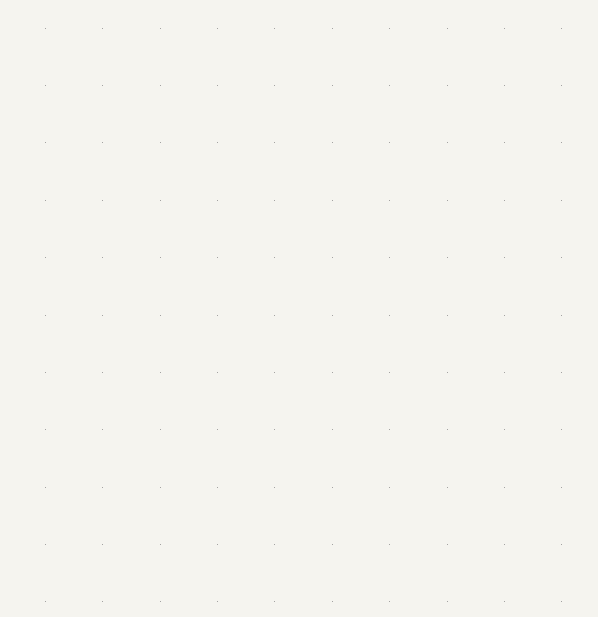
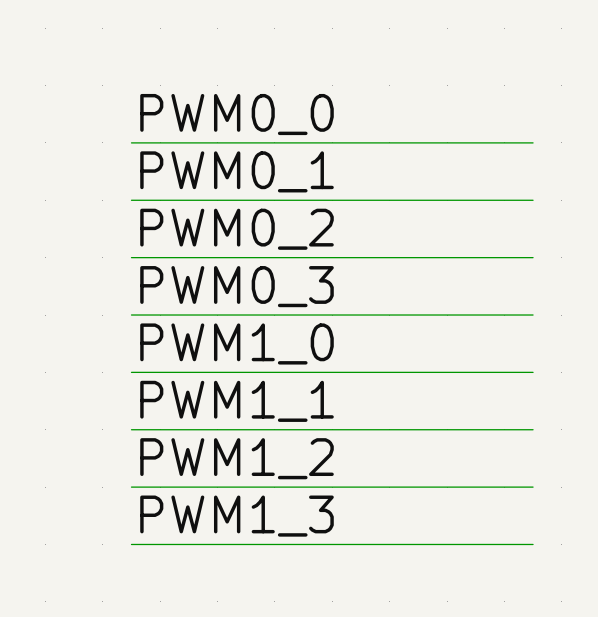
label: none -> PWM0_0 (237, 114)
wire: none -> (131, 142) (533, 142)
label: none -> PWM0_1 (237, 171)
wire: none -> (131, 200) (533, 200)
label: none -> PWM0_2 (237, 229)
wire: none -> (131, 257) (533, 257)
label: none -> PWM0_3 (237, 286)
wire: none -> (131, 315) (533, 315)
label: none -> PWM1_0 (237, 343)
wire: none -> (131, 372) (533, 372)
label: none -> PWM1_1 (237, 401)
wire: none -> (131, 429) (533, 429)
label: none -> PWM1_2 (237, 458)
wire: none -> (131, 487) (533, 487)
label: none -> PWM1_3 (237, 516)
wire: none -> (131, 544) (533, 544)

